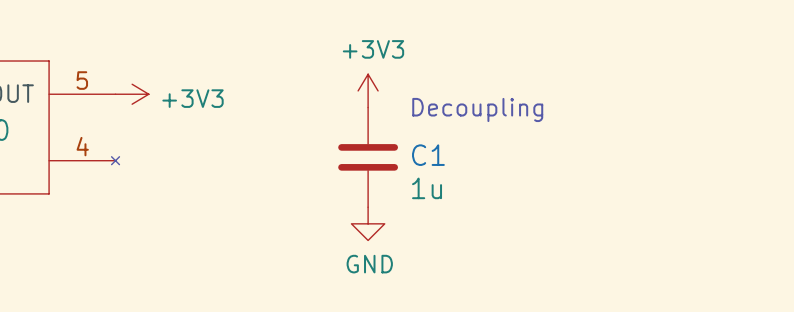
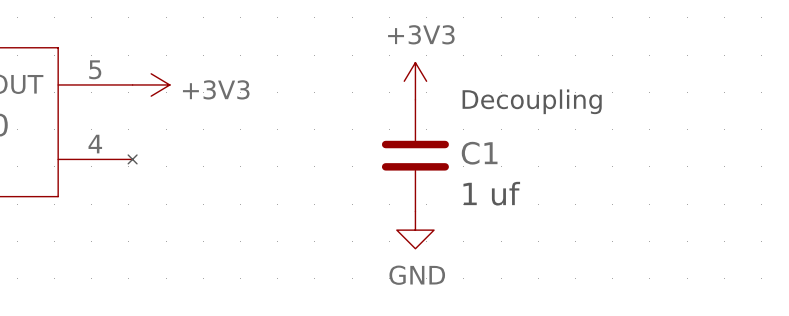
C1 value: 1u (427, 188) -> none
text: none -> 1 uf (491, 193)

